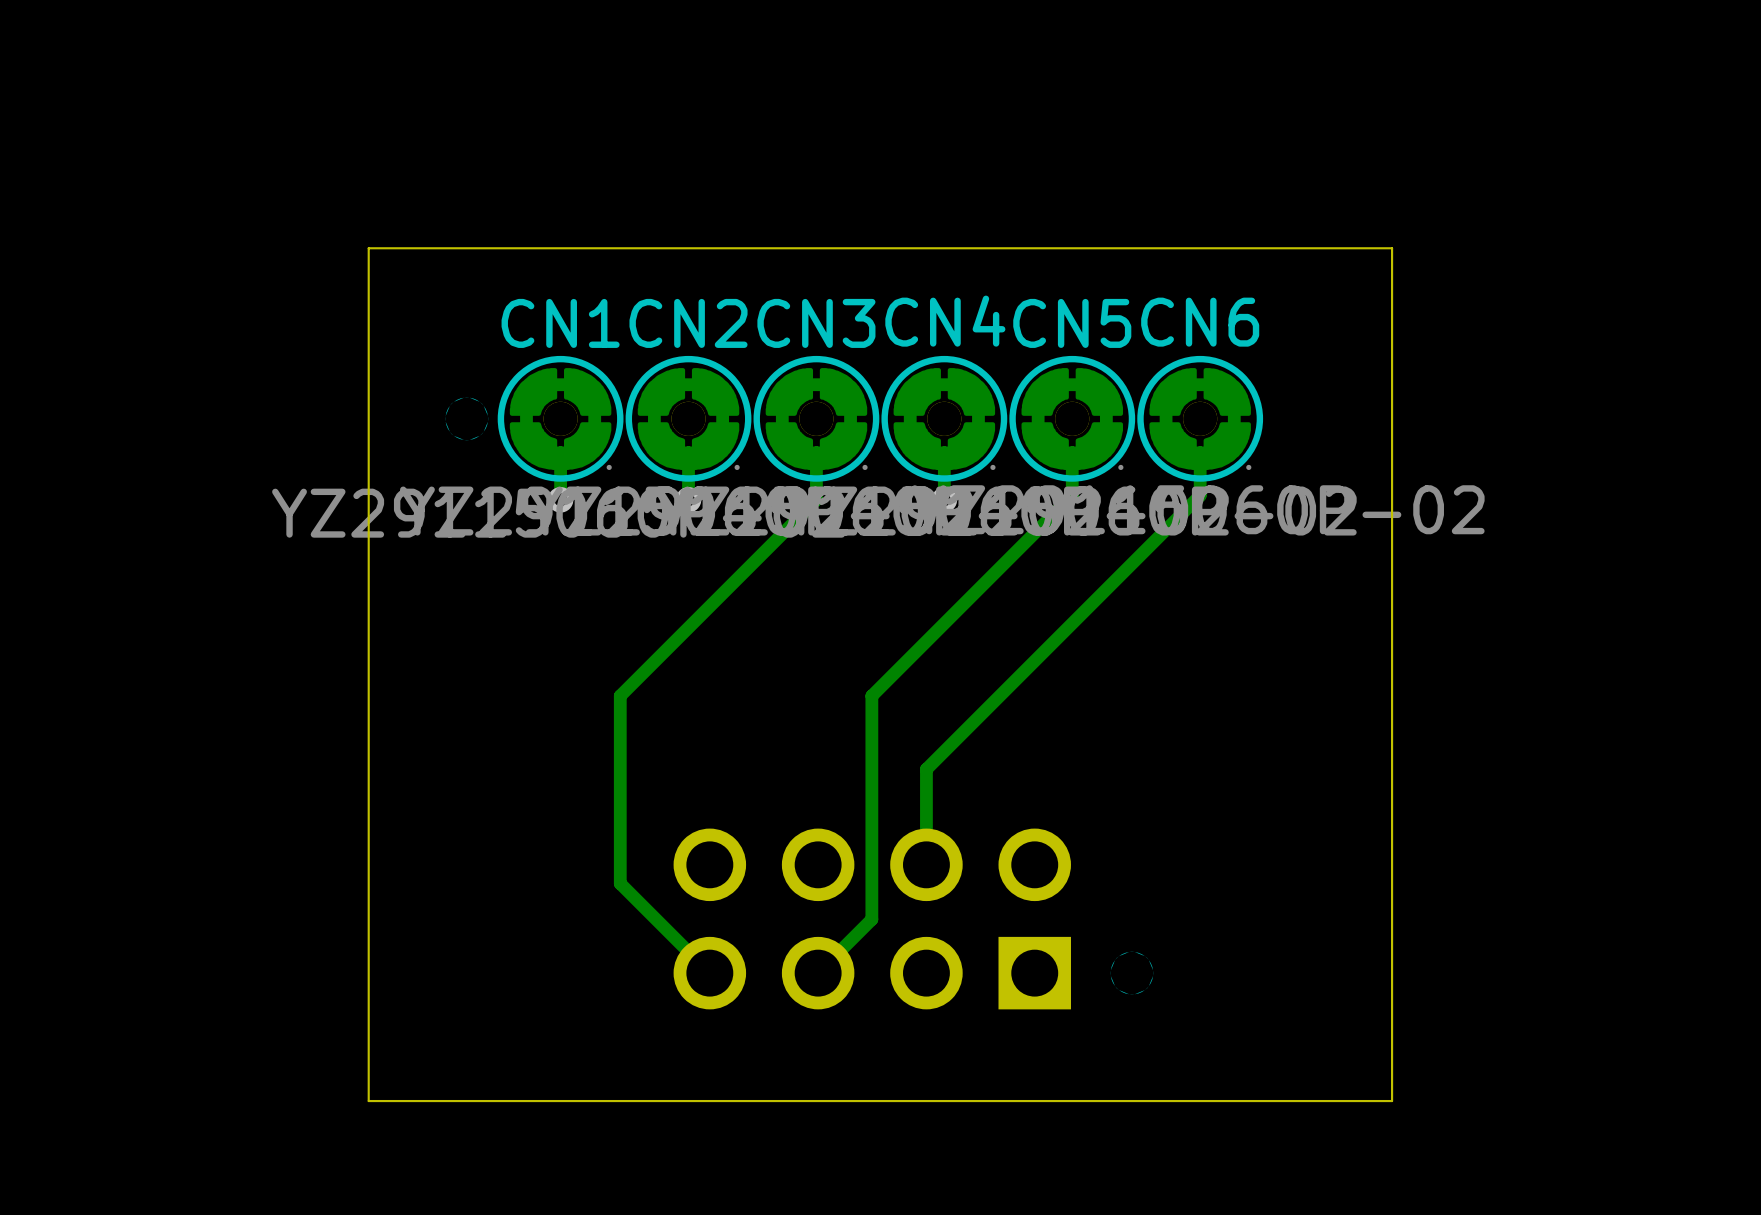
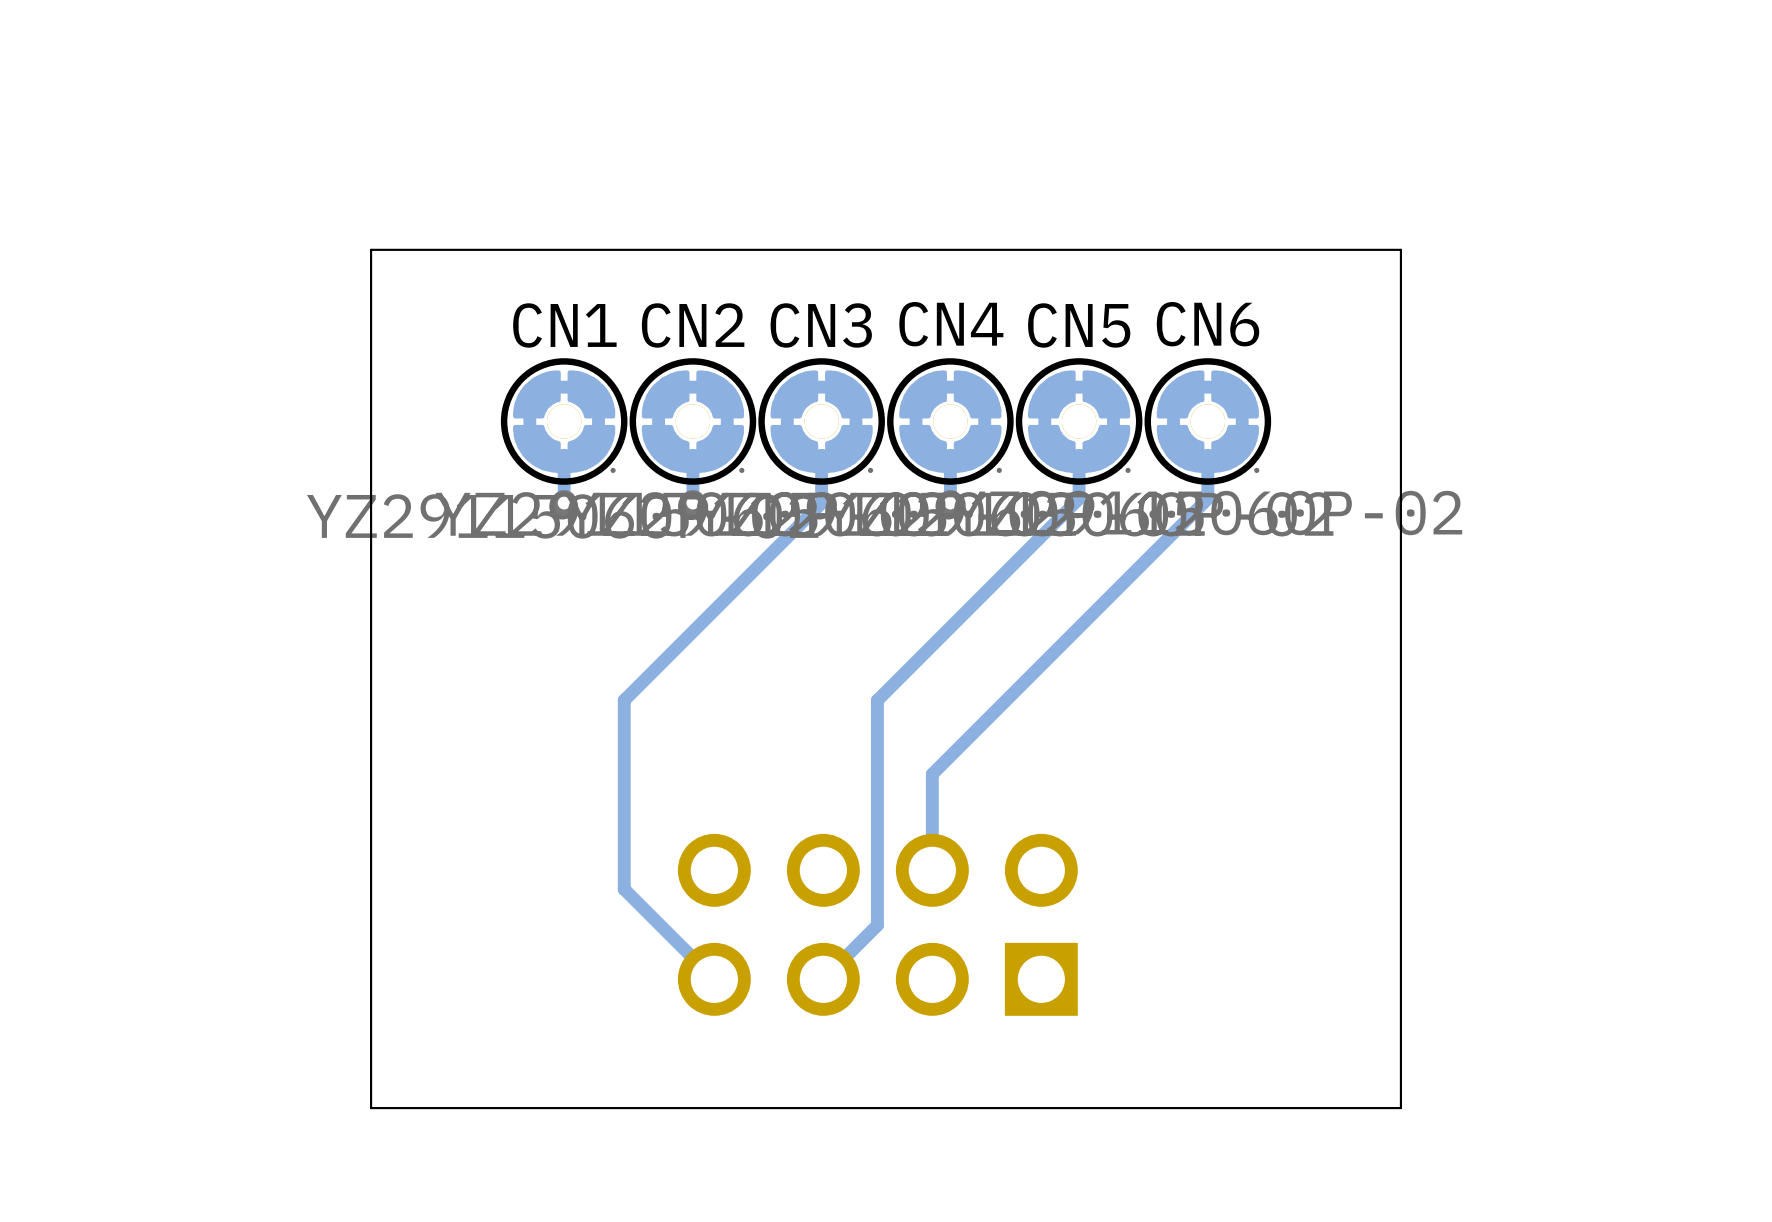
drawing: [445, 397, 489, 441] -> none
drawing: [1110, 951, 1154, 995] -> none

